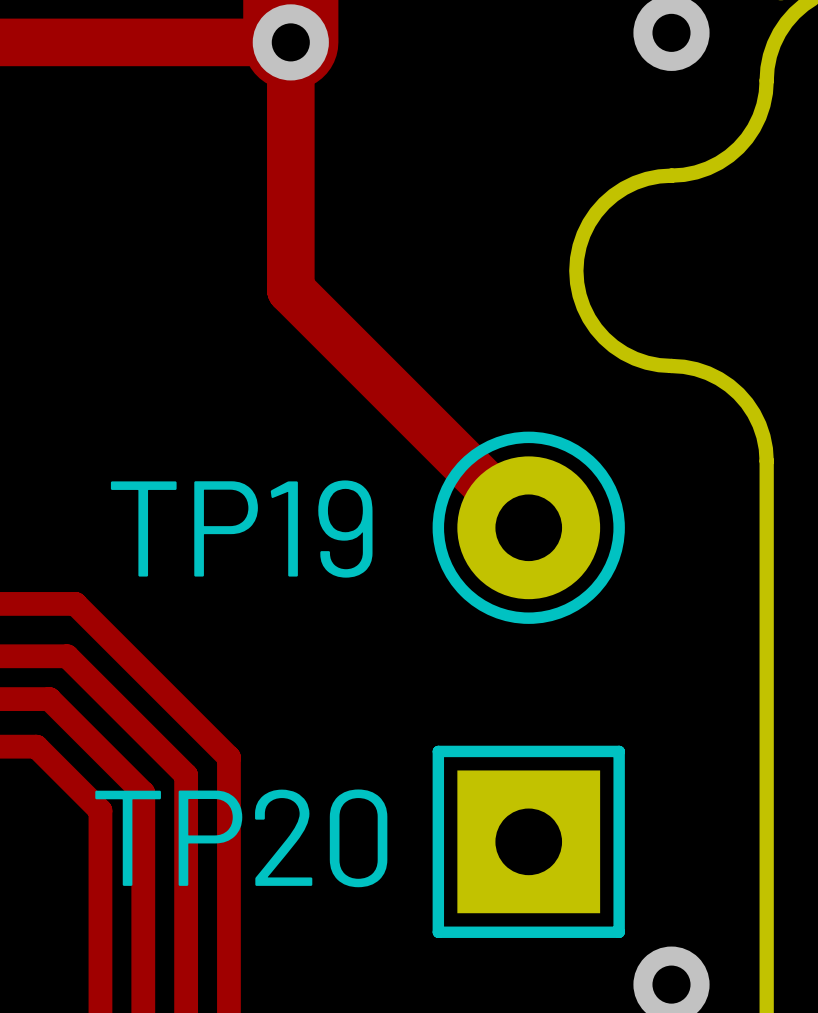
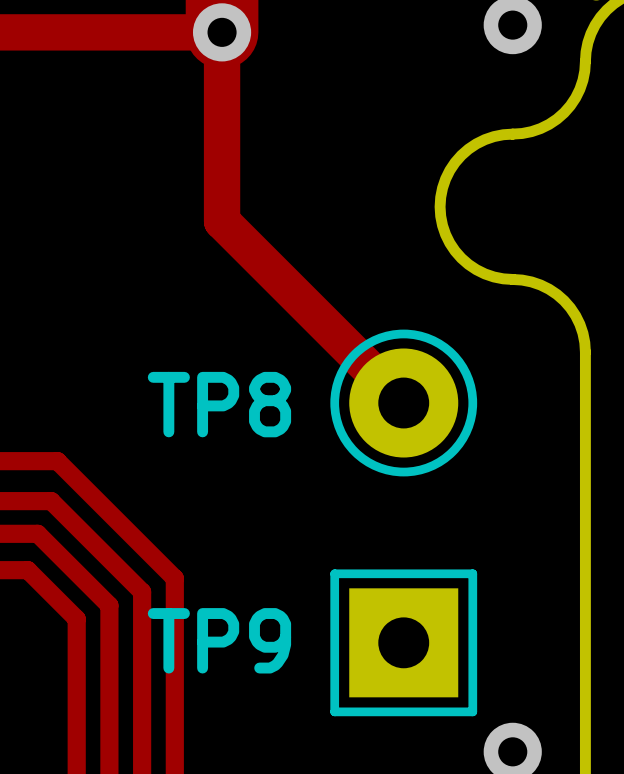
TP19 name: TP19 (241, 529) -> TP8 (219, 404)
TP20 name: TP20 (241, 838) -> TP9 (219, 640)

